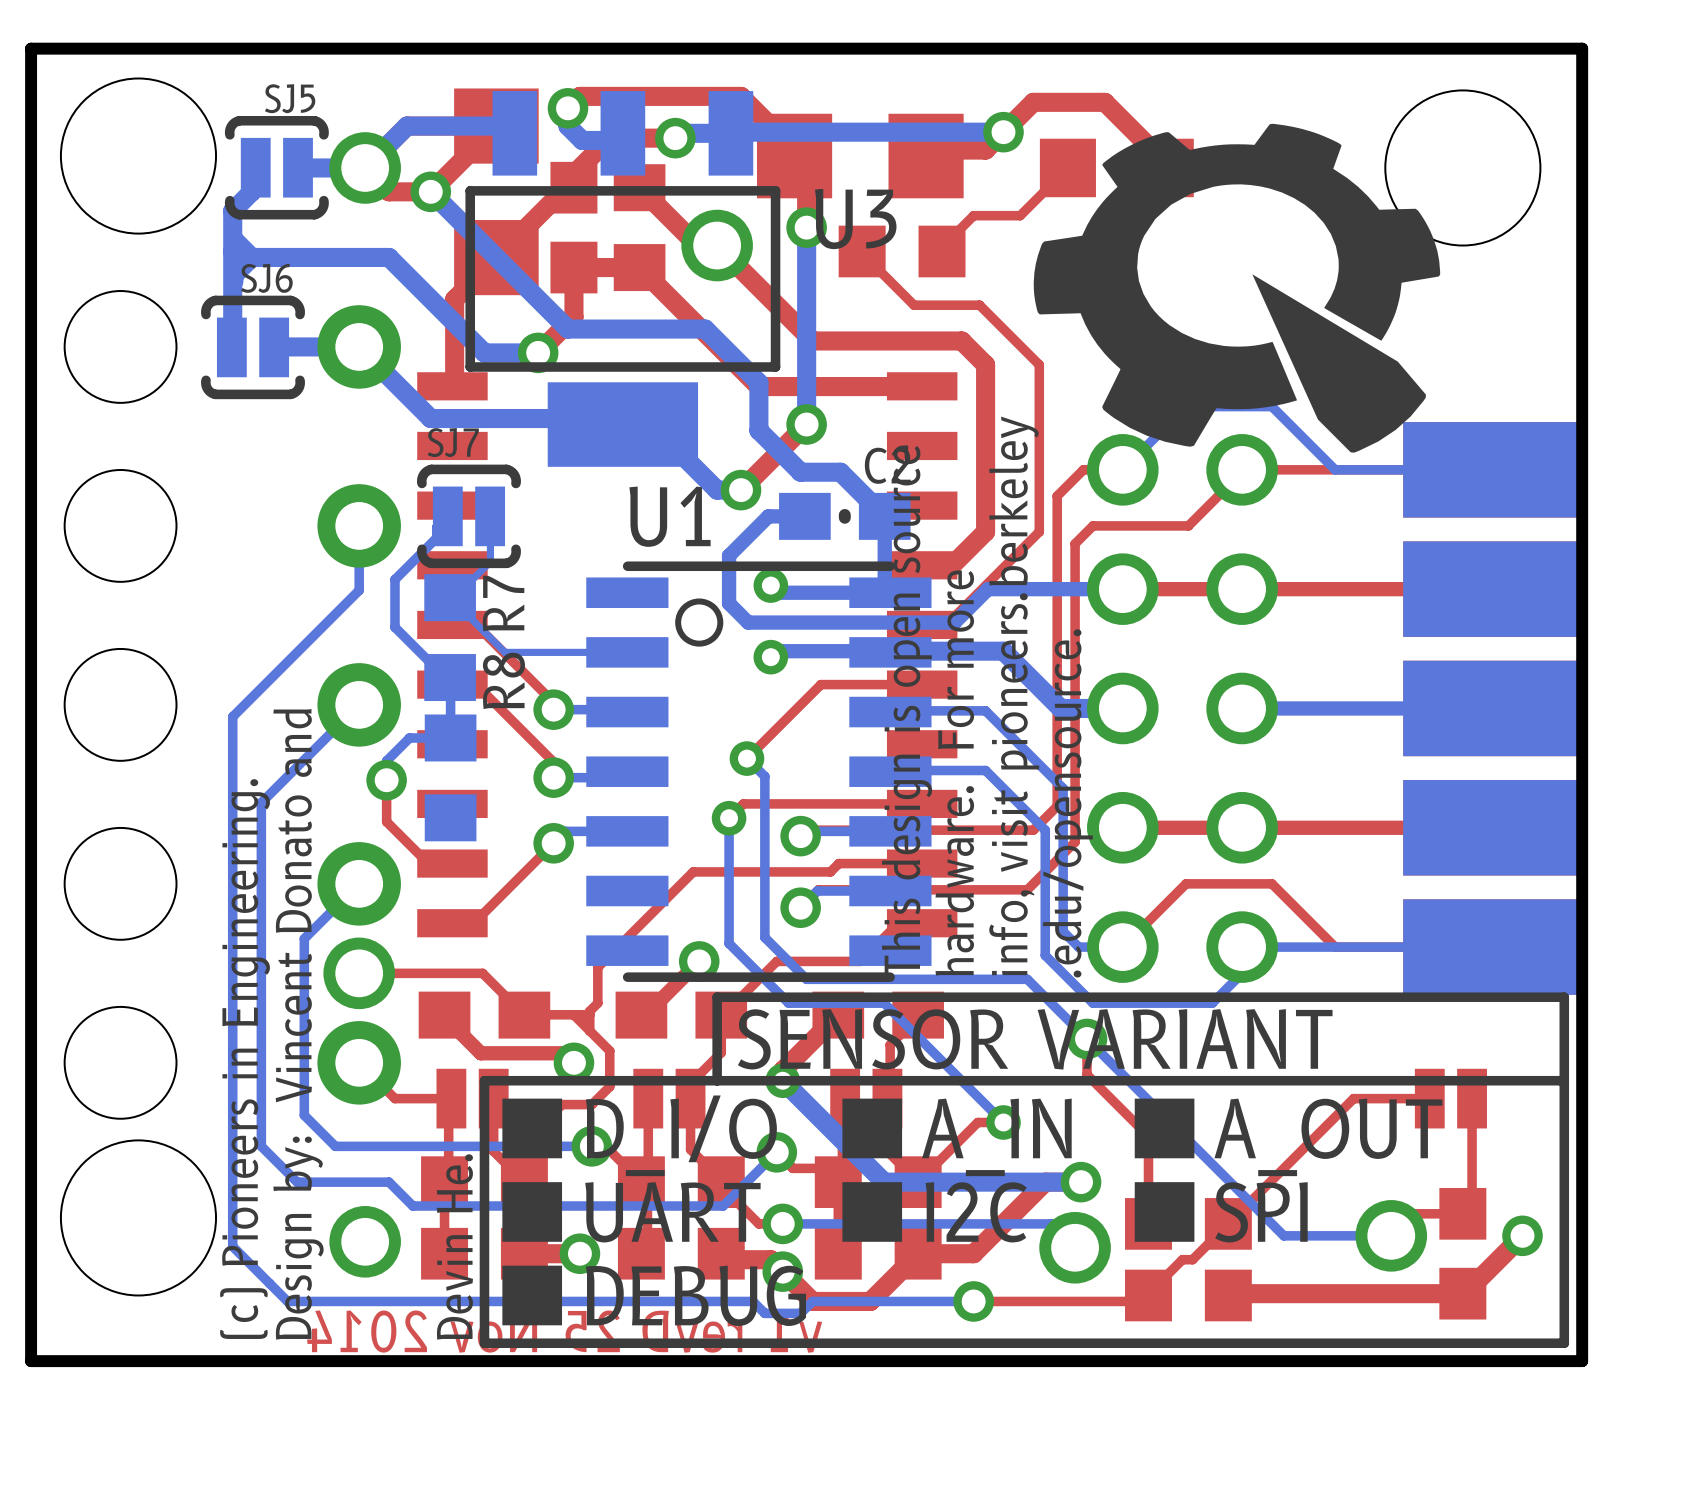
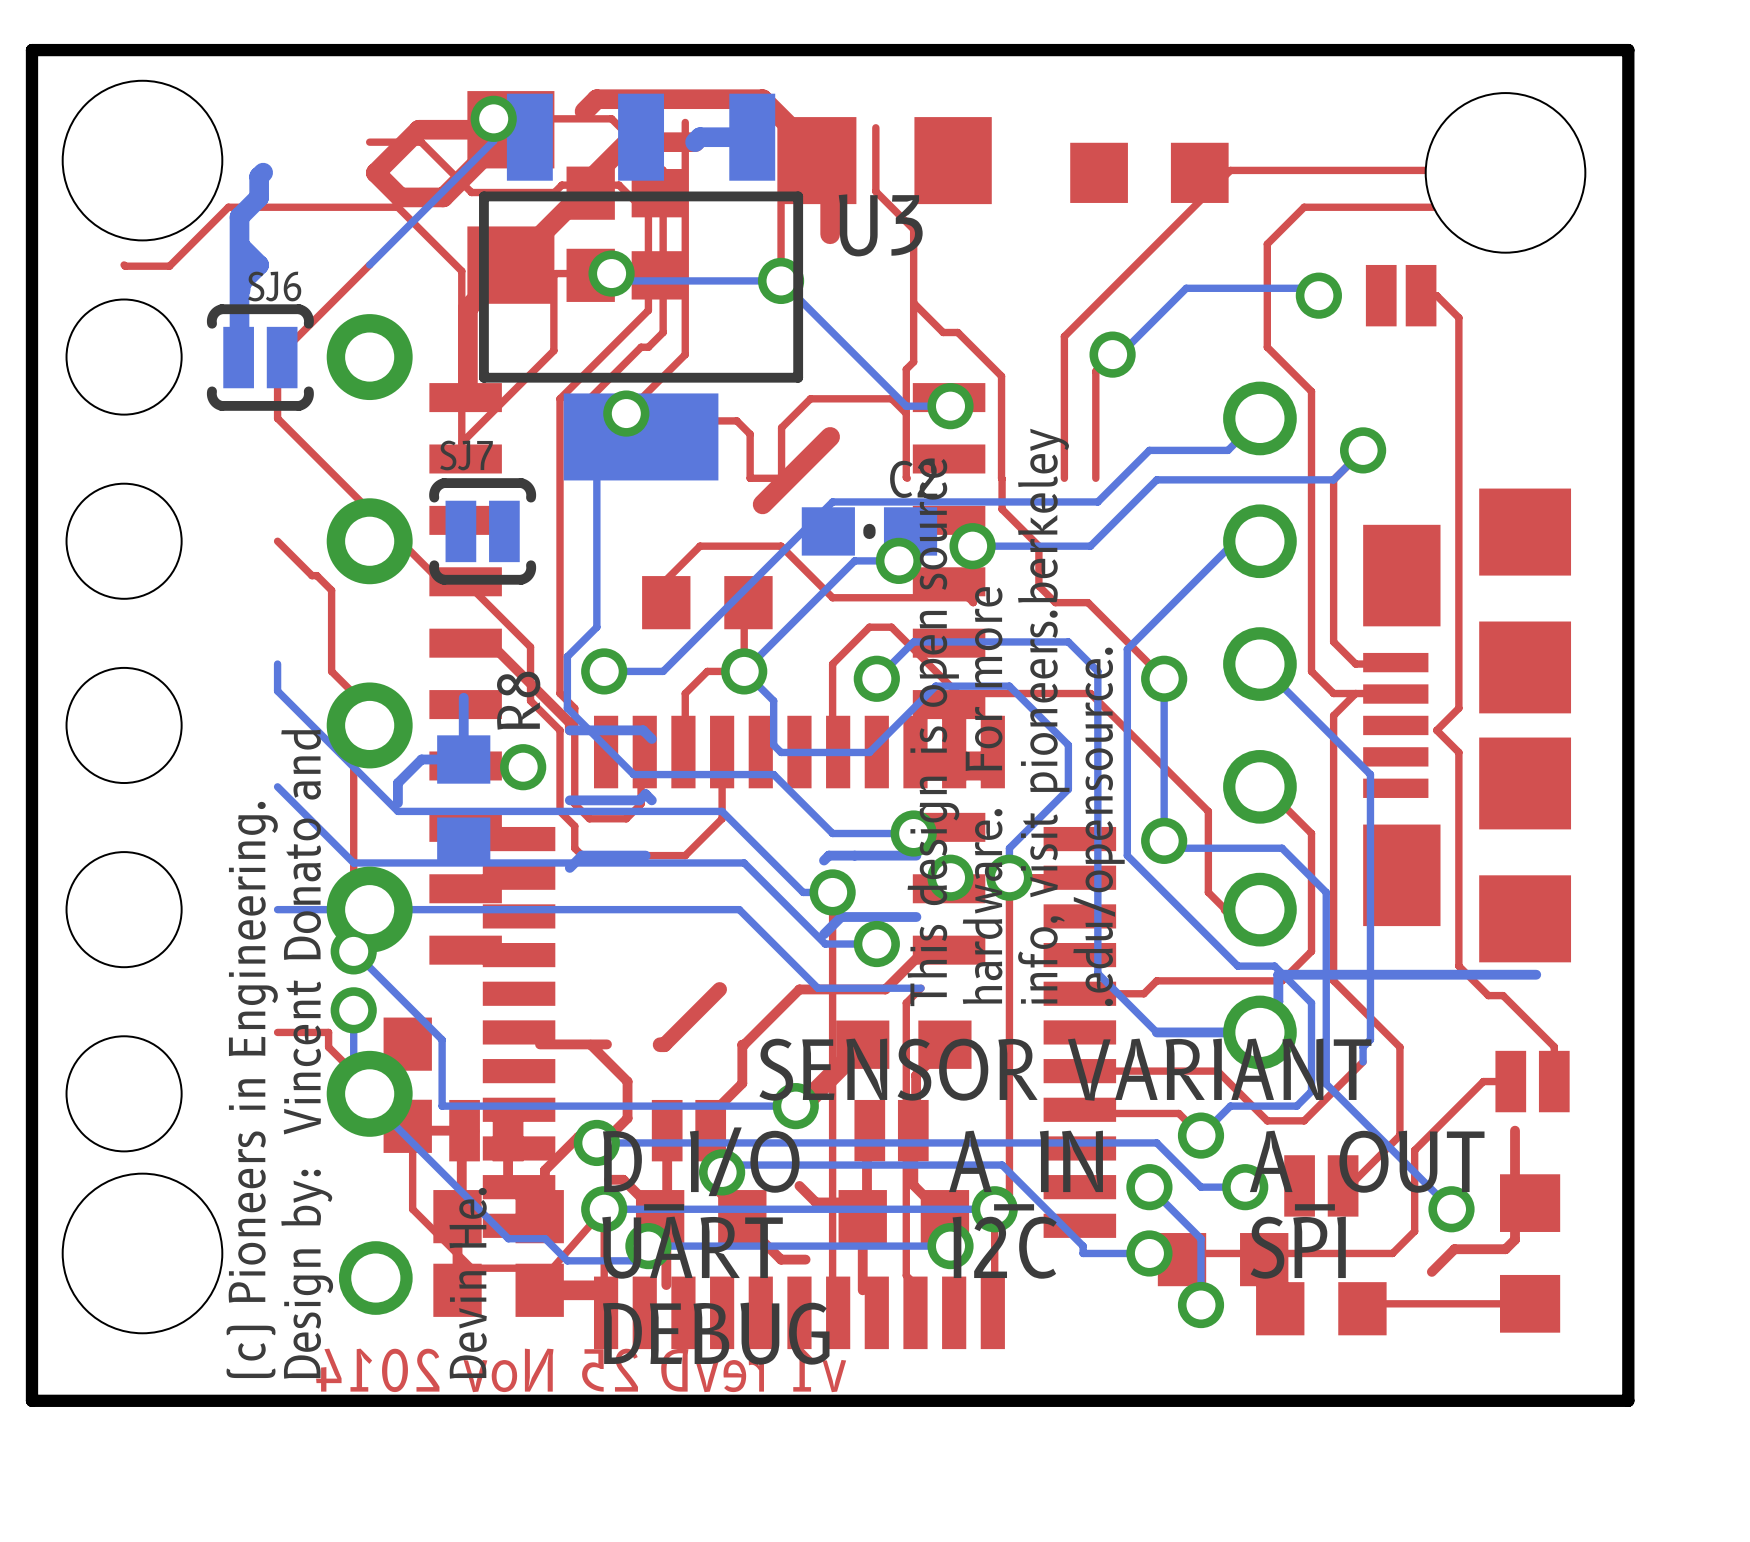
bottom track: (567, 108) (567, 126) (582, 140) (615, 140) -> none
via: (567, 108) -> none
bottom track: none -> (493, 118) (493, 140) (369, 264)
top track: none -> (493, 118) (611, 118) (663, 170) (663, 332) (648, 347) (641, 347) (582, 406) (582, 443) (589, 450) (648, 450) (677, 420) (736, 420) (750, 434) (750, 478) (781, 478) (781, 427) (810, 398) (891, 398) (906, 413)
via: none -> (493, 118)
top track: none -> (781, 120) (781, 280)
top track: none -> (685, 122) (685, 354) (626, 413)
drawing: [1033, 123, 1441, 453] -> none
top track: none -> (875, 127) (875, 191) (913, 229) (913, 361) (906, 369) (907, 478)
bottom track: (723, 126) (730, 133) (1003, 132) -> none
via: (1003, 132) -> none
bottom track: (514, 133) (503, 133) (496, 126) (407, 126) (365, 167) (298, 167) -> none
top track: none -> (369, 142) (421, 142) (471, 192) (553, 192)
via: (675, 138) -> none
top track: (926, 156) (932, 150) (985, 150) (1033, 102) (1104, 102) (1165, 163) (1165, 167) -> none
SJ5: (276, 167) -> none
part: (365, 167) -> none
top track: (1067, 167) (1020, 215) (973, 215) (942, 247) (942, 251) -> none
top track: none -> (1516, 172) (1513, 170) (1230, 170) (1064, 336) (1064, 478)
top track: none -> (1556, 172) (1556, 213) (1525, 244) (1480, 244) (1444, 207) (1304, 207) (1267, 244) (1267, 347) (1311, 391) (1311, 671) (1333, 693) (1395, 693)
top track: none -> (537, 193) (553, 193) (561, 185) (618, 185) (648, 214) (648, 310) (560, 398) (560, 693) (574, 708) (574, 804) (589, 818) (626, 818) (641, 804) (641, 755) (644, 752)
top track: (639, 187) (697, 245) (717, 245) (812, 340) (961, 340) (985, 364) (985, 531) (952, 565) (944, 565) -> none
bottom track: (430, 191) (567, 329) (705, 329) (758, 382) (758, 430) (800, 472) (840, 472) (884, 516) -> none
via: (430, 191) -> none
bottom track: (806, 227) (806, 424) -> none
via: (806, 227) -> none
part: (717, 245) -> none
bottom track: (232, 251) (238, 257) (389, 257) (484, 352) (538, 352) -> none
top track: (862, 251) (914, 305) (979, 305) (1039, 364) (1039, 531) (949, 621) (925, 621) (922, 624) -> none
part: (902, 251) -> none
top track: none -> (124, 264) (169, 266) (228, 207) (397, 207) (461, 271) (461, 442) (553, 350) (553, 275) (555, 273) (611, 273)
top track: none -> (369, 264) (277, 357) (277, 418) (437, 578) (461, 578) (530, 647) (530, 700) (560, 730) (560, 811) (574, 826) (574, 848) (582, 855) (685, 855) (722, 818) (722, 752)
bottom track: none -> (611, 273) (618, 280) (781, 280) (906, 406) (950, 406)
via: none -> (611, 273)
via: none -> (781, 280)
bottom track: none -> (1318, 295) (1311, 288) (1186, 288) (1119, 354) (1112, 354)
via: none -> (1318, 295)
part: none -> (1401, 295)
top track: none -> (1421, 295) (1436, 295) (1458, 317) (1458, 708) (1436, 730) (1458, 752) (1458, 966) (1488, 995) (1503, 995) (1554, 1046) (1554, 1081)
top track: none -> (913, 303) (943, 332) (957, 332) (1001, 376) (1001, 478)
top track: none -> (1112, 354) (1095, 371) (1095, 478)
via: none -> (1112, 354)
bottom track: (274, 346) (359, 346) (430, 418) (616, 418) (622, 424) (651, 424) (717, 490) (741, 490) -> none
top track: (538, 352) (573, 317) (573, 267) (639, 267) (758, 386) (921, 386) -> none
via: (538, 352) -> none
via: none -> (950, 406)
bottom track: none -> (626, 413) (596, 443) (596, 627) (567, 656) (567, 708) (633, 774) (773, 774) (832, 833) (913, 833)
via: none -> (626, 413)
bottom track: none -> (1259, 418) (1228, 450) (1149, 450) (1097, 501) (832, 501) (663, 671) (645, 671)
via: (806, 424) -> none
part footprint: [1087, 434, 1278, 983] -> [1223, 381, 1297, 1070]
bottom track: none -> (1363, 450) (1333, 479) (1156, 479) (1090, 546) (972, 546)
top track: none -> (1363, 450) (1333, 479) (1333, 641) (1355, 664) (1395, 662)
via: none -> (1363, 450)
top track: none -> (1002, 478) (1002, 509) (1038, 546) (1038, 586) (1055, 602) (1088, 602) (1164, 678)
top track: (1122, 469) (1083, 469) (1057, 496) (1057, 806) (1033, 830) (806, 830) (800, 836) -> none
bottom track: (1492, 469) (1335, 469) (1271, 406) (1186, 406) (1122, 469) -> none
top track: (1492, 469) (1242, 469) (1242, 472) (1188, 525) (1092, 525) (1075, 543) (1075, 842) (1027, 889) (818, 889) (800, 907) -> none
via: (741, 490) -> none
bottom track: (447, 516) (436, 527) (436, 537) (394, 579) (394, 627) (445, 677) (450, 677) -> none
bottom track: (490, 516) (490, 561) (466, 585) (448, 585) (450, 597) (504, 652) (587, 652) -> none
bottom track: (804, 516) (768, 516) (729, 555) (729, 603) (748, 622) (954, 622) (987, 589) (1122, 589) -> none
bottom track: (884, 516) (884, 587) (890, 592) (777, 592) (770, 585) -> none
top track: none -> (277, 541) (311, 575) (316, 575) (331, 590) (331, 671) (353, 693) (353, 951)
bottom track: (359, 525) (359, 590) (232, 716) (232, 1246) (287, 1301) (752, 1301) (764, 1313) (800, 1313) (812, 1301) (973, 1301) -> none
bottom track: none -> (1259, 541) (1235, 541) (1127, 649) (1127, 855) (1237, 966) (1274, 966) (1311, 1002) (1311, 1091) (1296, 1106) (1230, 1106) (1201, 1135)
via: none -> (972, 546)
bottom track: none -> (898, 560) (854, 560) (744, 671) (773, 700) (773, 745) (781, 752) (869, 752) (935, 686) (1009, 686) (1068, 745) (1068, 789) (1009, 848) (1009, 877)
via: none -> (898, 560)
part: none -> (707, 602)
top track: none -> (748, 602) (744, 606) (744, 671) (707, 671) (685, 693) (683, 752)
via: (770, 585) -> none
top track: none -> (973, 602) (968, 597) (832, 597) (781, 546) (699, 546) (666, 579) (666, 602)
top track: (1492, 589) (1122, 589) -> none
R7: (450, 637) -> none
bottom track: none -> (277, 664) (277, 691) (397, 811) (722, 811) (803, 892) (832, 892)
bottom track: none -> (1259, 664) (1370, 774) (1370, 1039) (1363, 1047) (1363, 1061)
bottom track: (891, 651) (776, 651) (770, 657) -> none
bottom track: (891, 651) (1003, 651) (1060, 708) (1122, 708) -> none
via: none -> (604, 671)
via: none -> (744, 671)
via: (770, 657) -> none
via: none -> (876, 678)
bottom track: none -> (1164, 678) (1164, 840) (1171, 848) (1282, 848) (1326, 892) (1326, 1084) (1451, 1209)
via: none -> (1164, 678)
top track: none -> (1355, 693) (1333, 715) (1333, 980) (1399, 1047) (1399, 1135) (1349, 1185)
top track: (452, 684) (454, 686) (478, 686) (553, 762) (553, 777) -> none
top track: (922, 684) (820, 684) (746, 758) -> none
bottom track: (359, 704) (261, 802) (261, 1146) (297, 1182) (389, 1182) (412, 1206) (723, 1206) (776, 1152) -> none
part: none -> (1467, 725)
bottom track: (1492, 708) (1242, 708) -> none
part: (1492, 708) -> none
via: (553, 709) -> none
bottom track: (890, 712) (985, 710) (1063, 788) (1063, 931) (1078, 947) (1122, 947) -> none
via: none -> (523, 767)
bottom track: (746, 758) (764, 776) (764, 937) (806, 979) (1027, 979) (1283, 1235) (1391, 1235) -> none
via: (746, 758) -> none
bottom track: none -> (277, 786) (353, 862) (744, 862) (825, 944) (876, 944)
top track: none -> (1259, 786) (1264, 786) (1311, 833) (1311, 951) (1282, 980) (1156, 980) (1143, 993) (1079, 993)
U1: (758, 771) -> none
bottom track: (890, 771) (985, 770) (1045, 830) (1045, 955) (1092, 1003) (1124, 1003) -> (876, 678) (913, 641) (1068, 641) (1097, 671) (1097, 973) (1156, 1032)
via: (553, 777) -> none
top track: (386, 780) (386, 821) (421, 856) (427, 856) (427, 863) (452, 863) -> none
via: (386, 780) -> none
top track: (922, 803) (743, 803) (729, 818) -> none
via: none -> (913, 833)
via: none -> (1164, 840)
bottom track: (729, 818) (729, 943) (788, 1003) (884, 1003) (1003, 1122) -> none
via: (729, 818) -> none
top track: (1492, 827) (1122, 827) -> none
via: (800, 836) -> none
top track: (553, 843) (473, 923) (452, 923) -> none
via: (553, 843) -> none
via: none -> (950, 877)
via: none -> (1009, 877)
top track: none -> (1079, 877) (1009, 877) (1009, 1194) (994, 1209) (994, 1310) (992, 1312)
top track: (941, 863) (838, 863) (830, 871) (693, 871) (597, 967) (597, 1003) (589, 1011) (589, 1030) -> none
top track: none -> (832, 892) (832, 1307) (838, 1312)
via: none -> (832, 892)
bottom track: none -> (277, 909) (739, 909) (817, 988) (921, 988)
bottom track: (359, 883) (304, 938) (304, 1115) (335, 1146) (591, 1146) -> none
top track: (1190, 883) (1186, 883) (1122, 947) -> (1225, 909) (1208, 892) (1208, 811) (1090, 693) (957, 693) (891, 627) (869, 627) (832, 664) (832, 746) (838, 752)
top track: (1224, 883) (1271, 883) (1335, 947) (1492, 947) -> none
via: (800, 907) -> none
via: none -> (876, 944)
bottom track: none -> (353, 951) (442, 1039) (442, 1106) (795, 1106)
via: none -> (353, 951)
top track: none -> (921, 988) (906, 1002) (906, 1275) (921, 1290) (921, 1307) (915, 1312)
via: (699, 961) -> none
top track: (359, 973) (482, 973) (524, 1015) -> none
part: (359, 973) -> none
bottom track: none -> (353, 1010) (353, 1084) (508, 1238) (545, 1238) (567, 1260) (633, 1260) (648, 1246) (950, 1246)
via: none -> (353, 1010)
top track: none -> (277, 1032) (328, 1032) (328, 1047) (412, 1131) (412, 1209) (471, 1268) (552, 1268) (604, 1209) (604, 1310) (606, 1312)
part: none -> (799, 1032)
top track: (444, 1015) (448, 1015) (448, 1021) (480, 1053) (564, 1053) (573, 1062) -> none
part rotation: 0° (484, 1015) -> 90° clockwise (407, 1085)
part position: (484, 1015) -> (407, 1085)
part: (681, 1015) -> none
top track: none -> (1363, 1061) (1304, 1120) (1267, 1120) (1217, 1071) (1079, 1071)
top track: (1087, 1038) (1087, 1074) (1148, 1136) (1148, 1223) -> none
via: (1087, 1038) -> none
top track: none -> (1510, 1081) (1483, 1081) (1414, 1150) (1414, 1231) (1392, 1253) (1149, 1253)
via: (573, 1062) -> none
via size: [765, 1063, 801, 1099] -> [772, 1083, 819, 1130]
top track: none -> (1079, 1109) (1083, 1113) (1178, 1113) (1201, 1135)
bottom track: (782, 1080) (884, 1182) (1081, 1182) -> none
line: (1564, 1080) (484, 1080) (484, 1343) (1564, 1343) (1564, 997) (717, 997) (717, 1080) -> none
drawing: [502, 1098, 563, 1326] -> none
drawing: [842, 1098, 903, 1242] -> none
drawing: [1134, 1098, 1195, 1242] -> none
top track: (1429, 1098) (1353, 1098) (1192, 1259) (1182, 1259) (1142, 1301) (973, 1301) -> none
part position: (1450, 1098) -> (1532, 1081)
via: none -> (1201, 1135)
bottom track: none -> (596, 1142) (1156, 1142) (1201, 1187) (1245, 1187)
via: none -> (596, 1142)
top track: (1003, 1122) (977, 1122) (918, 1182) (925, 1182) (929, 1178) (929, 1169) -> none
via: (1003, 1122) -> none
bottom track: none -> (722, 1172) (729, 1165) (1002, 1165) (1083, 1246) (1083, 1253) (1149, 1253)
via: none -> (722, 1172)
via: (591, 1146) -> none
via: (776, 1152) -> none
part: none -> (1321, 1185)
bottom track: none -> (1149, 1187) (1201, 1238) (1201, 1305)
via: none -> (1149, 1187)
via: none -> (1245, 1187)
via: none -> (604, 1209)
bottom track: none -> (994, 1209) (604, 1209)
via: none -> (994, 1209)
via: none -> (1451, 1209)
top track: (1081, 1182) (1045, 1182) (973, 1253) (918, 1253) (870, 1301) (812, 1301) (770, 1259) (729, 1259) (721, 1253) -> none
via: (1081, 1182) -> none
part footprint: [1439, 1187, 1487, 1320] -> [1500, 1174, 1561, 1333]
via: none -> (648, 1246)
via: none -> (950, 1246)
via: none -> (1149, 1253)
bottom track: (782, 1223) (1051, 1223) (1075, 1247) -> none
via: (782, 1223) -> none
part: (1391, 1235) -> none
top track: (1522, 1235) (1464, 1293) (1230, 1293) (1228, 1295) -> none
via: (1522, 1235) -> none
part: (1075, 1247) -> none
via: (579, 1253) -> none
part: (681, 1253) -> none
part: (878, 1253) -> none
top track: none -> (1530, 1303) (1367, 1303) (1362, 1308)
via: none -> (1201, 1305)
via: (782, 1271) -> none
part position: (1188, 1295) -> (1321, 1308)
via: (973, 1301) -> none

